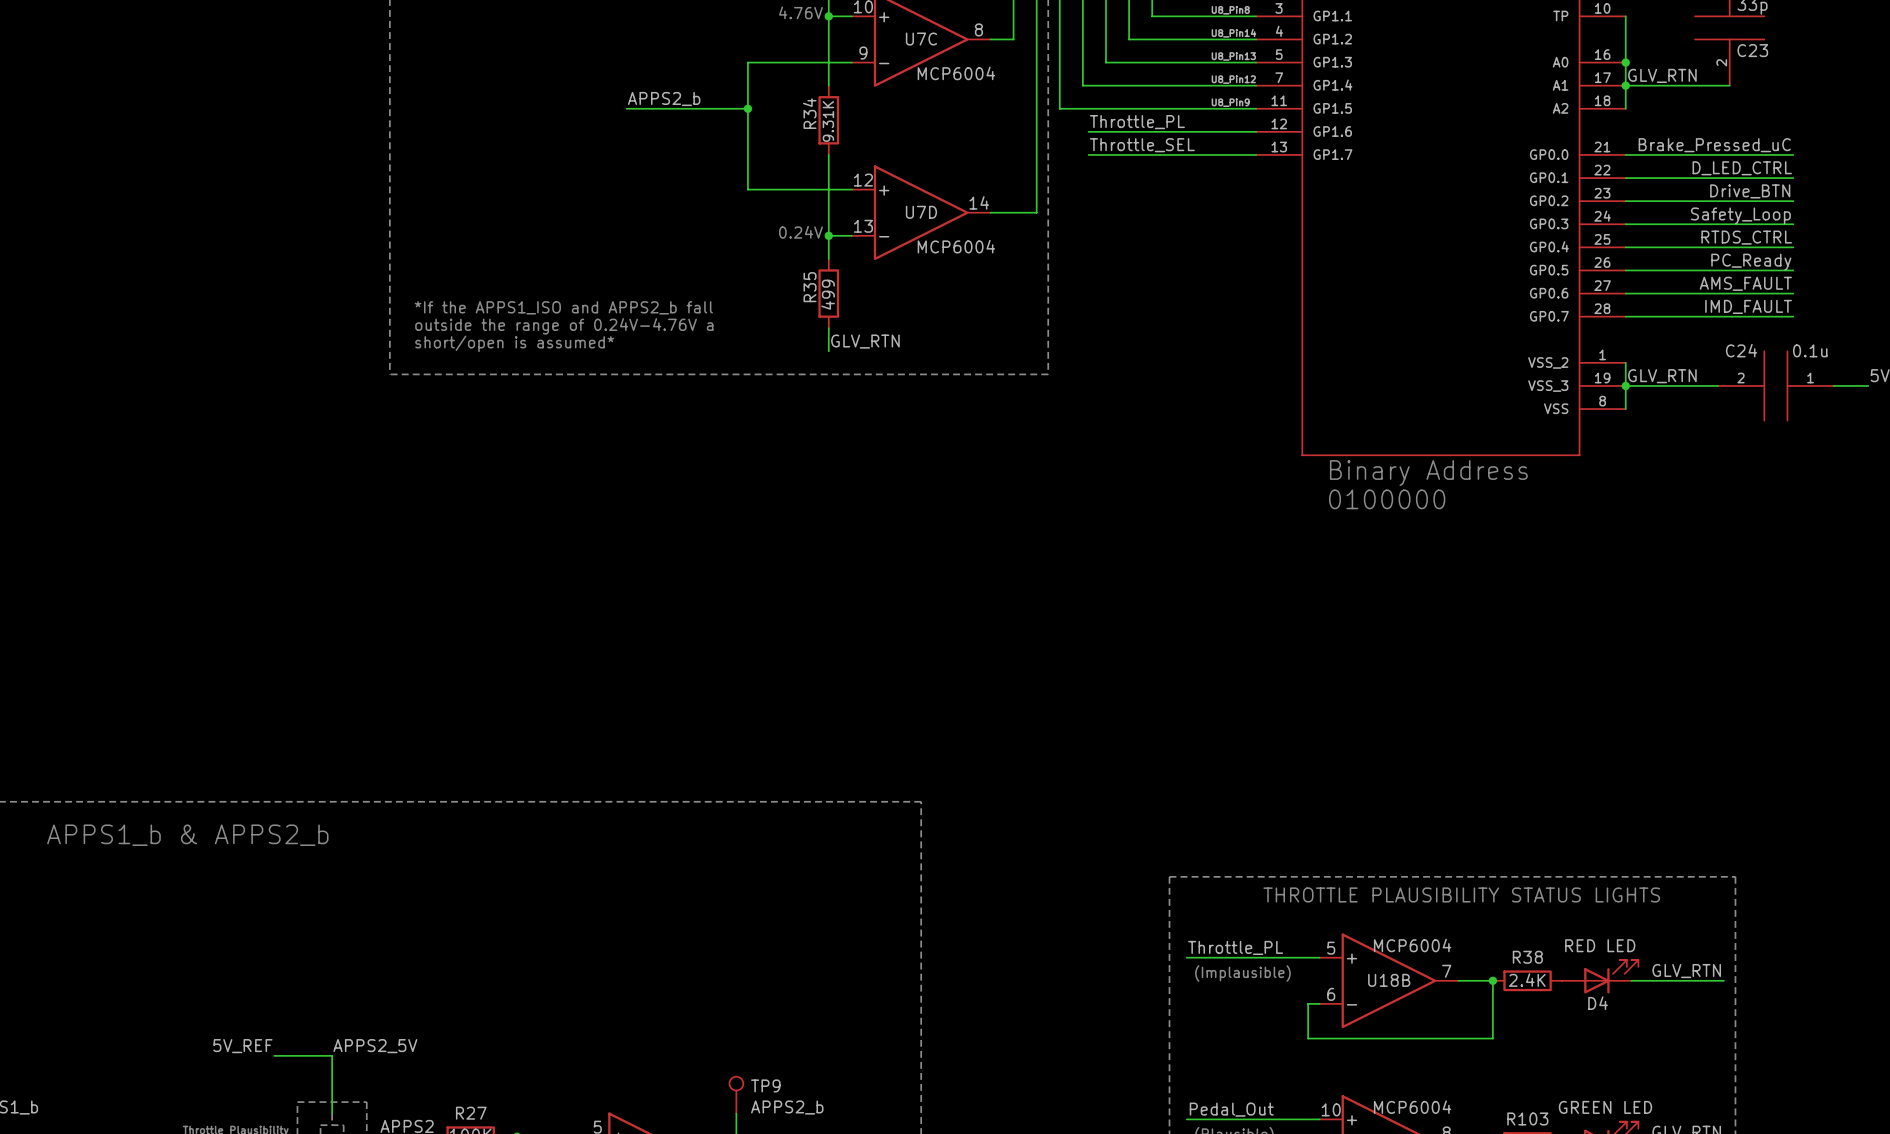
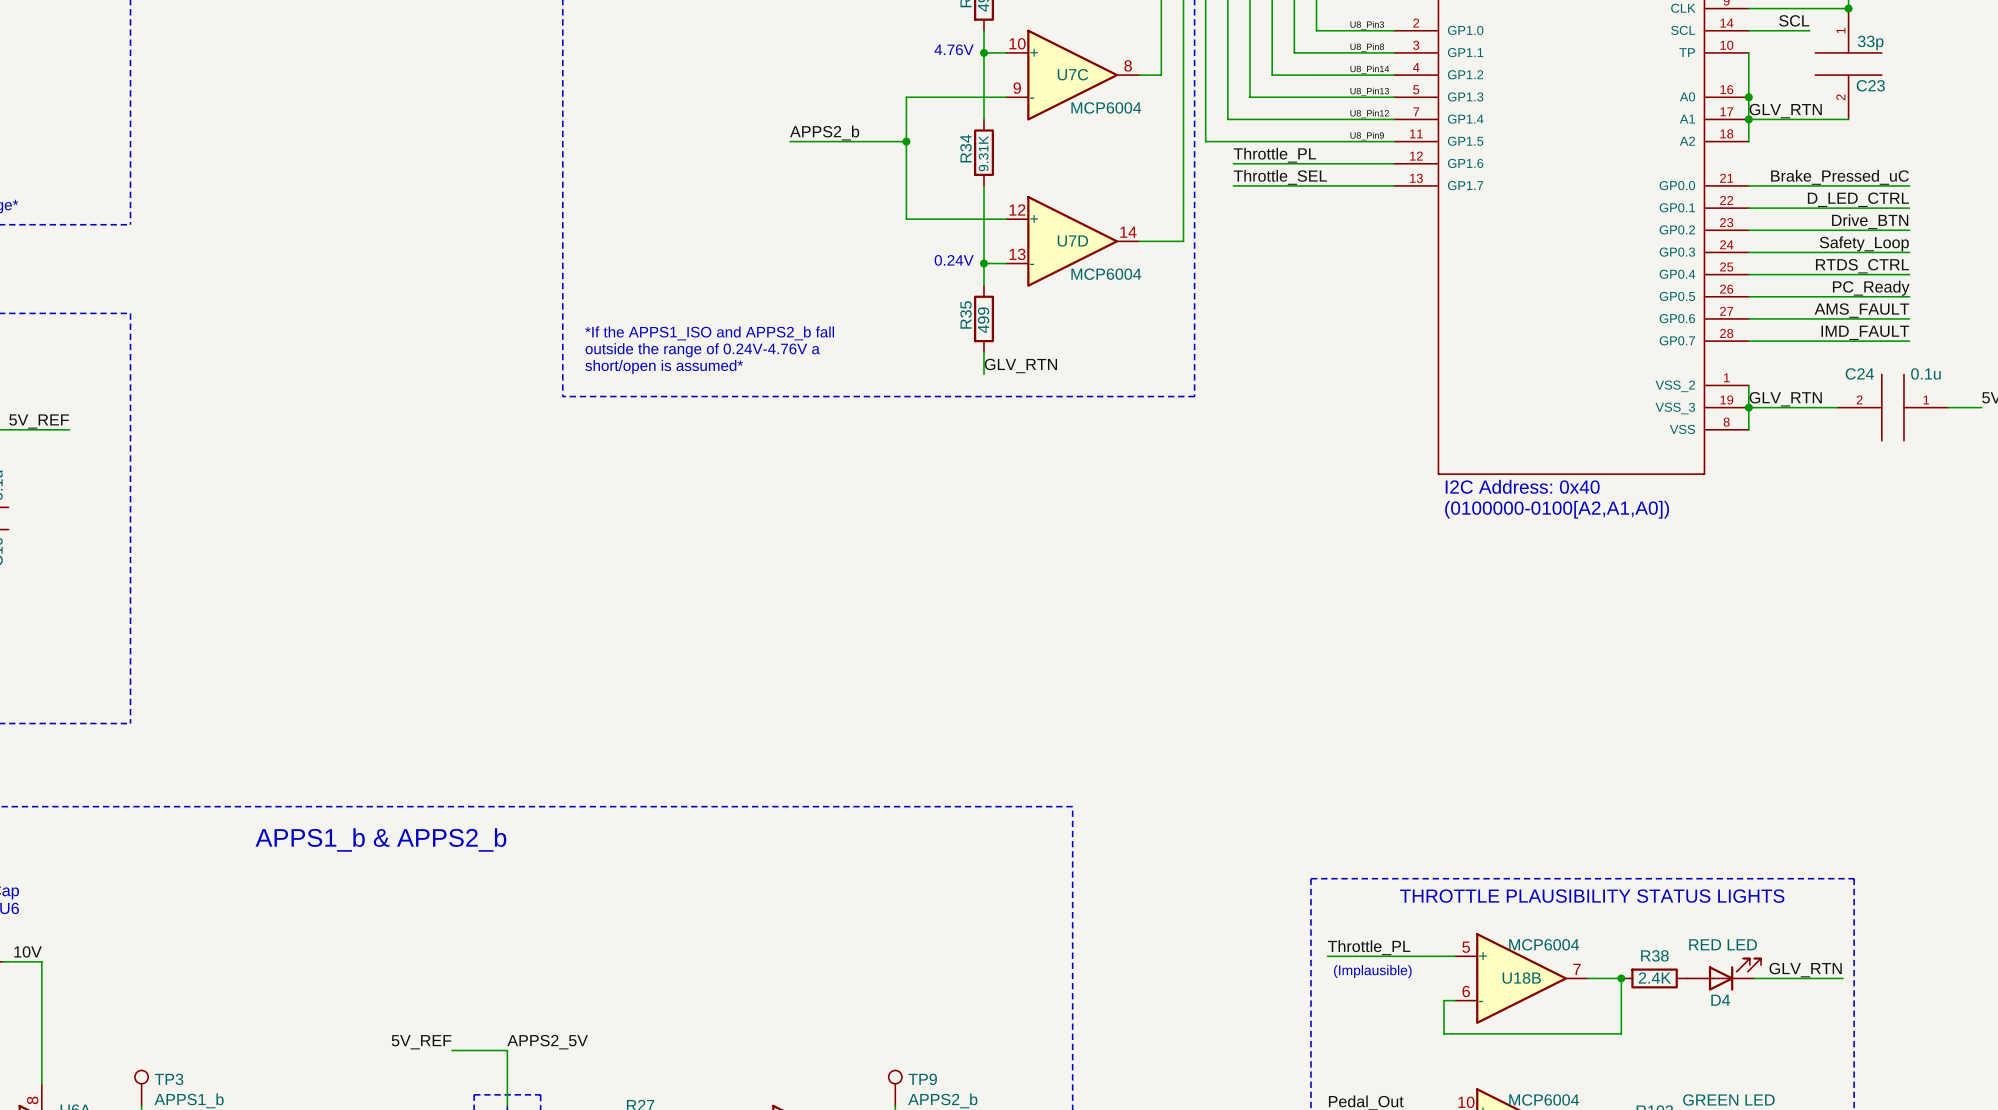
text: none -> I2C Address: 0x40 (1522, 486)
text: Binary Address (1428, 473) -> none
text: none -> (0100000-0100[A2,A1,A0]) (1557, 509)
text: 0100000 (1387, 499) -> none

